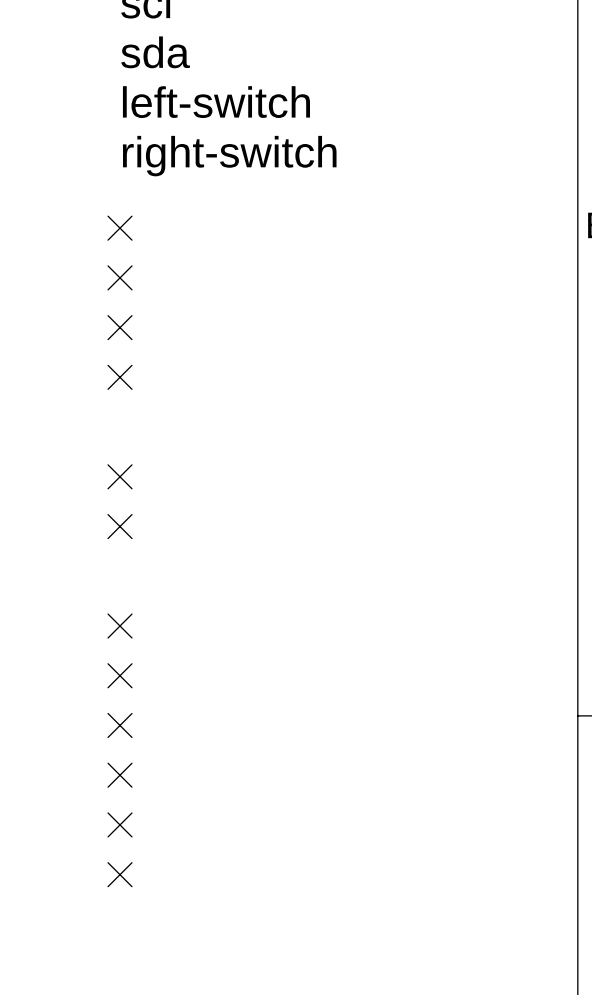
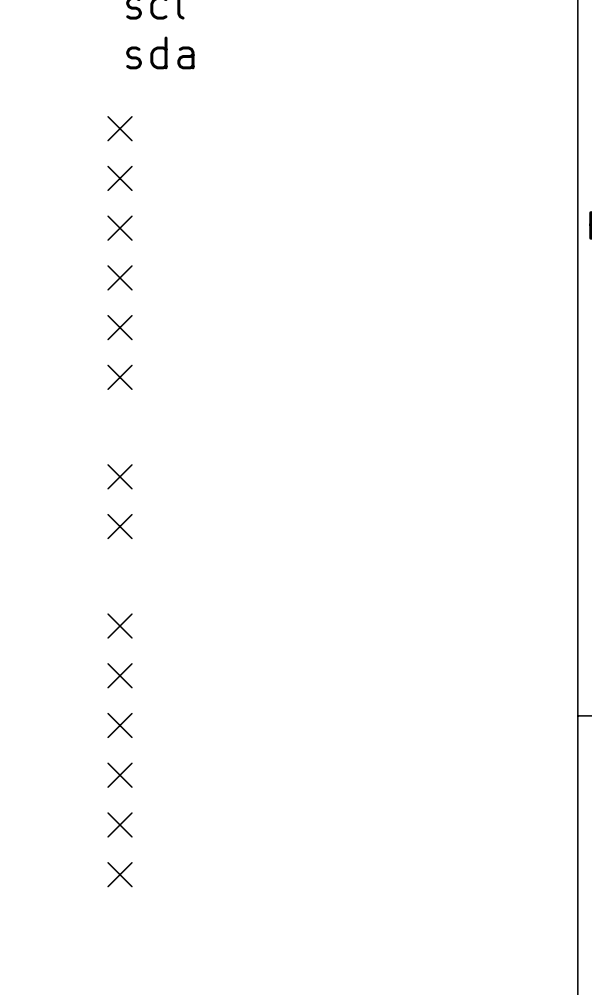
label: left-switch (216, 102) -> none
no-connect mark: none -> (120, 128)
label: right-switch (229, 156) -> none
no-connect mark: none -> (120, 178)

